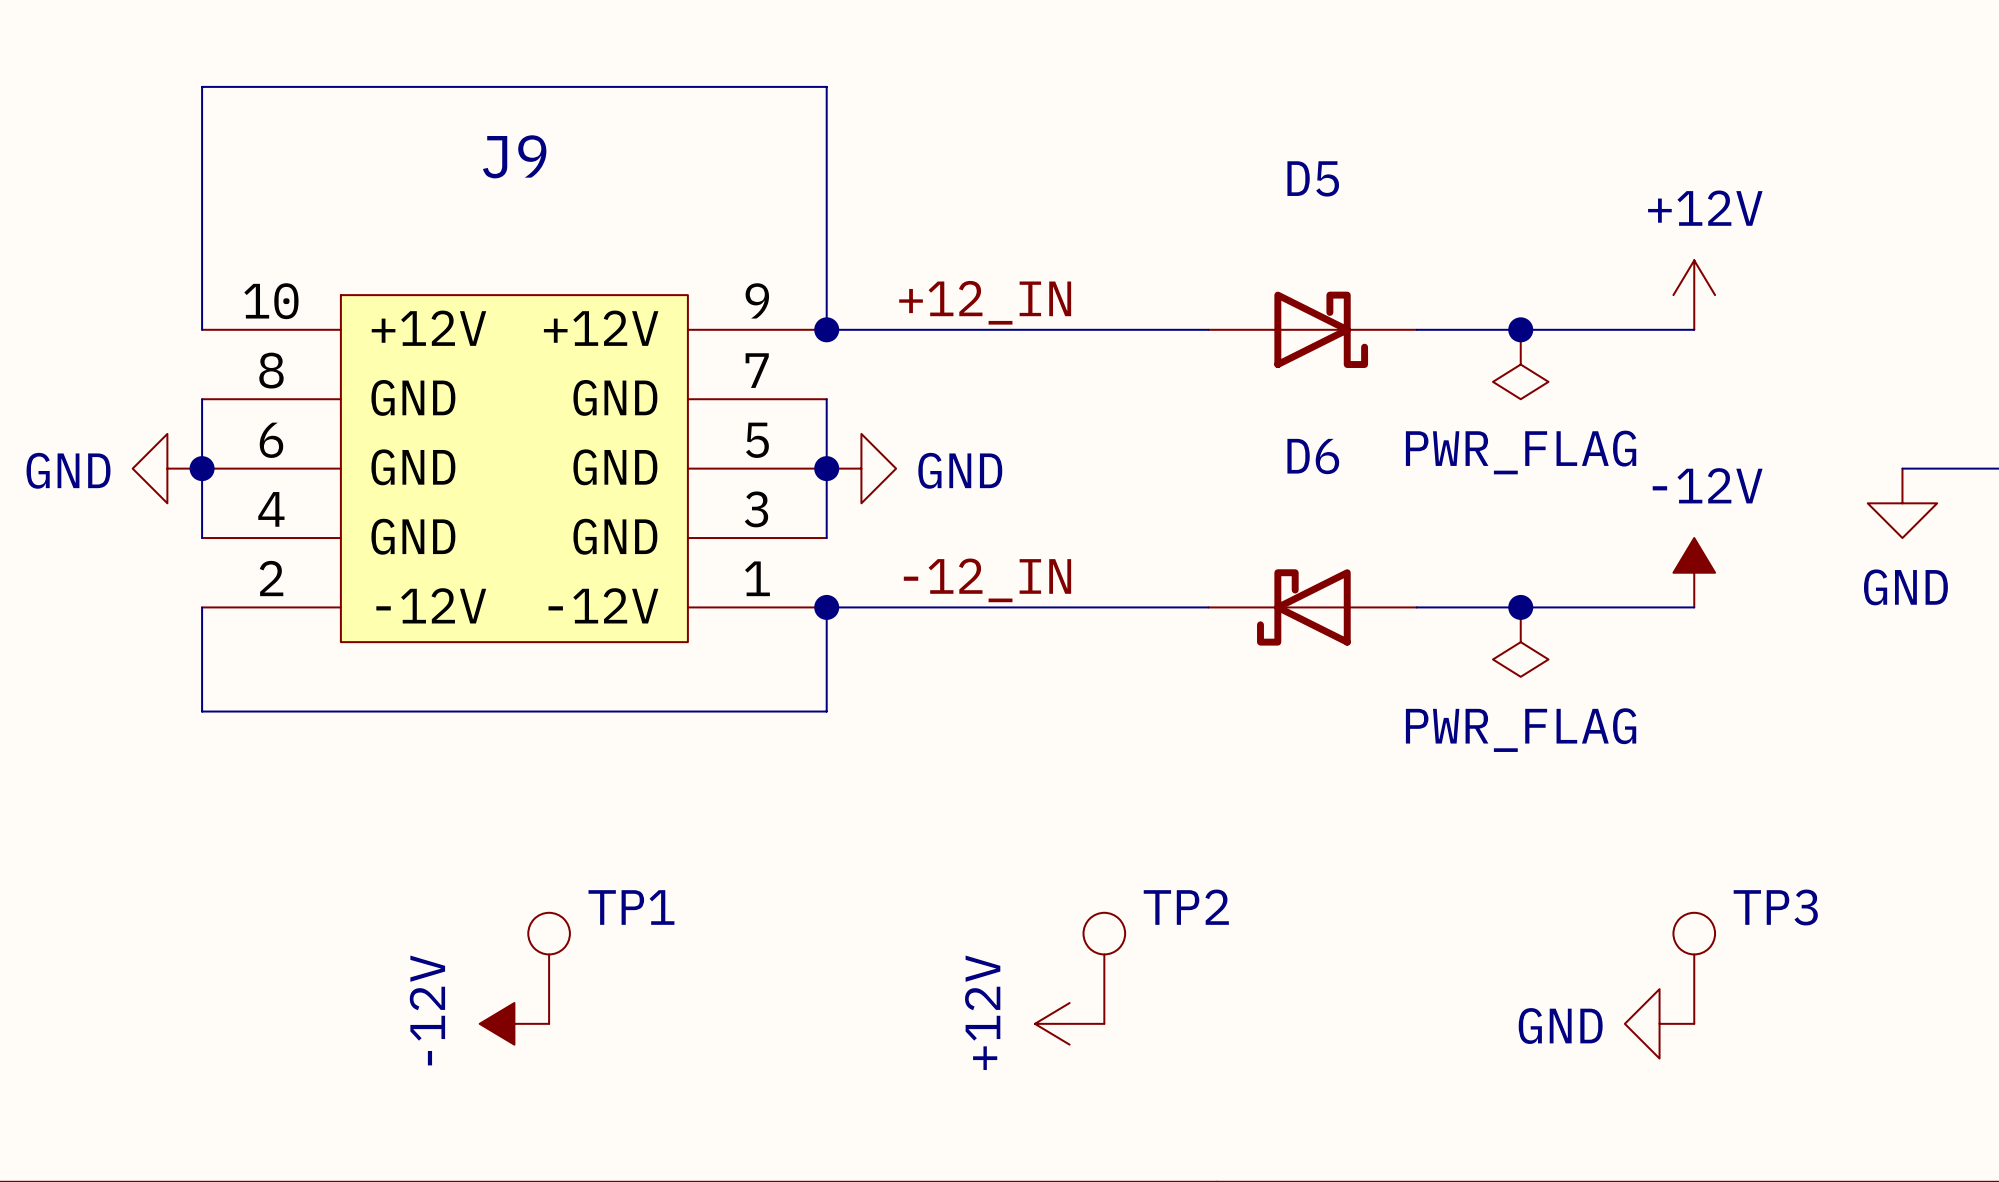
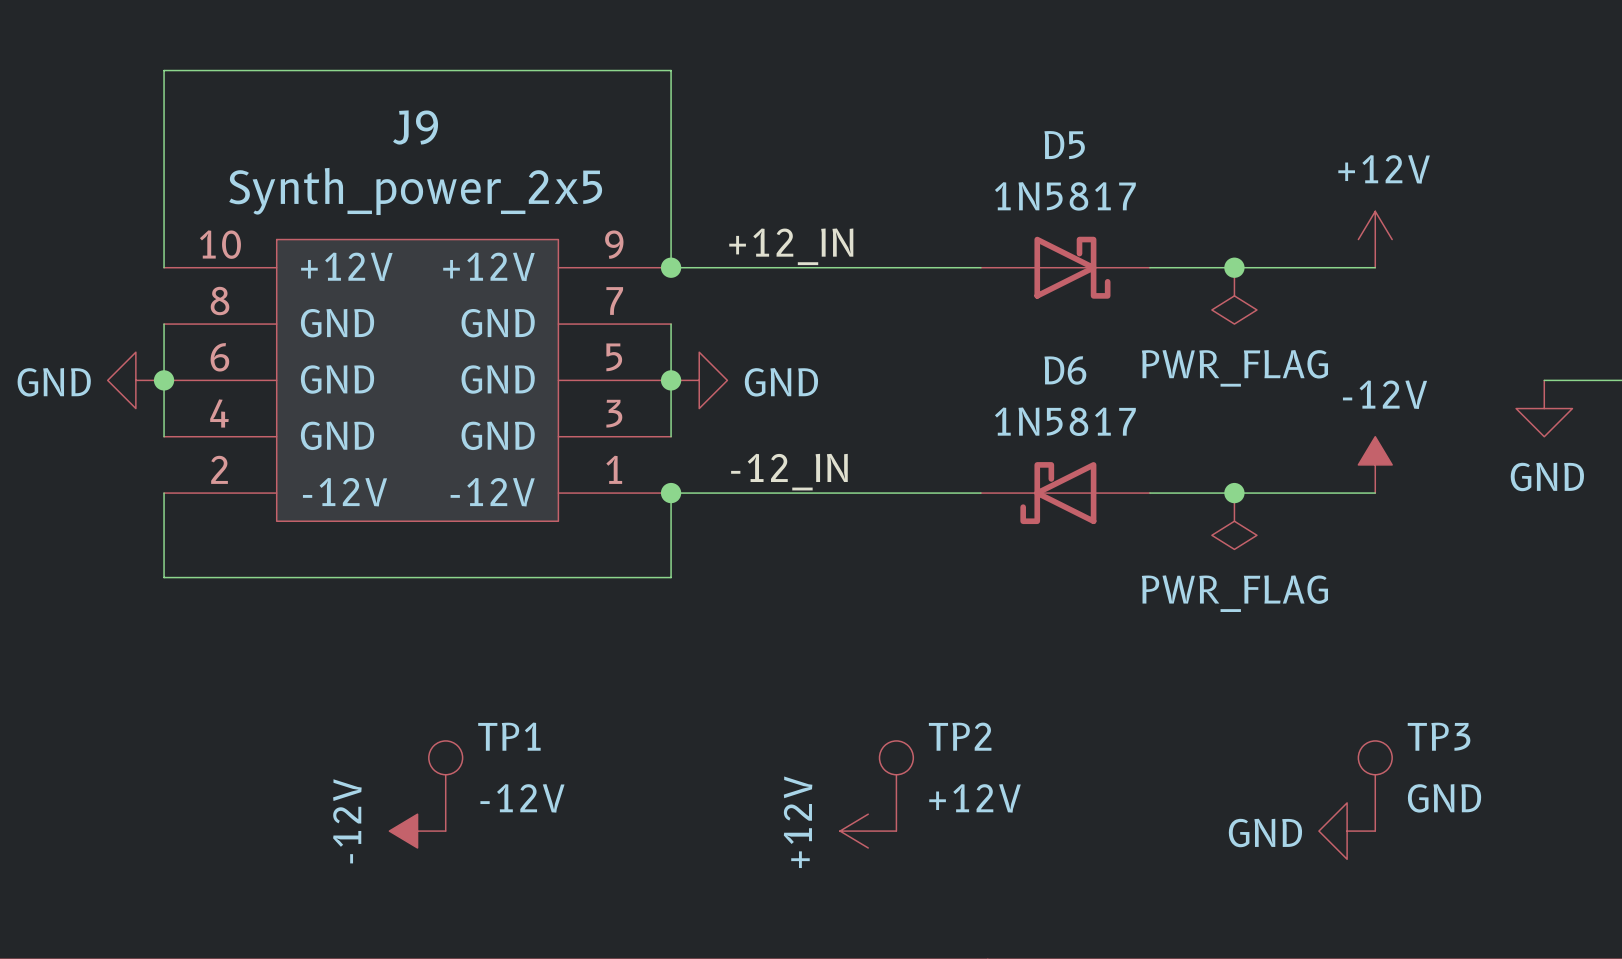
J9 value: none -> Synth_power_2x5 (415, 191)
D5 value: none -> 1N5817 (1065, 196)
D6 value: none -> 1N5817 (1065, 421)
TP1 value: none -> -12V (522, 798)
TP2 value: none -> +12V (975, 798)
TP3 value: none -> GND (1444, 798)

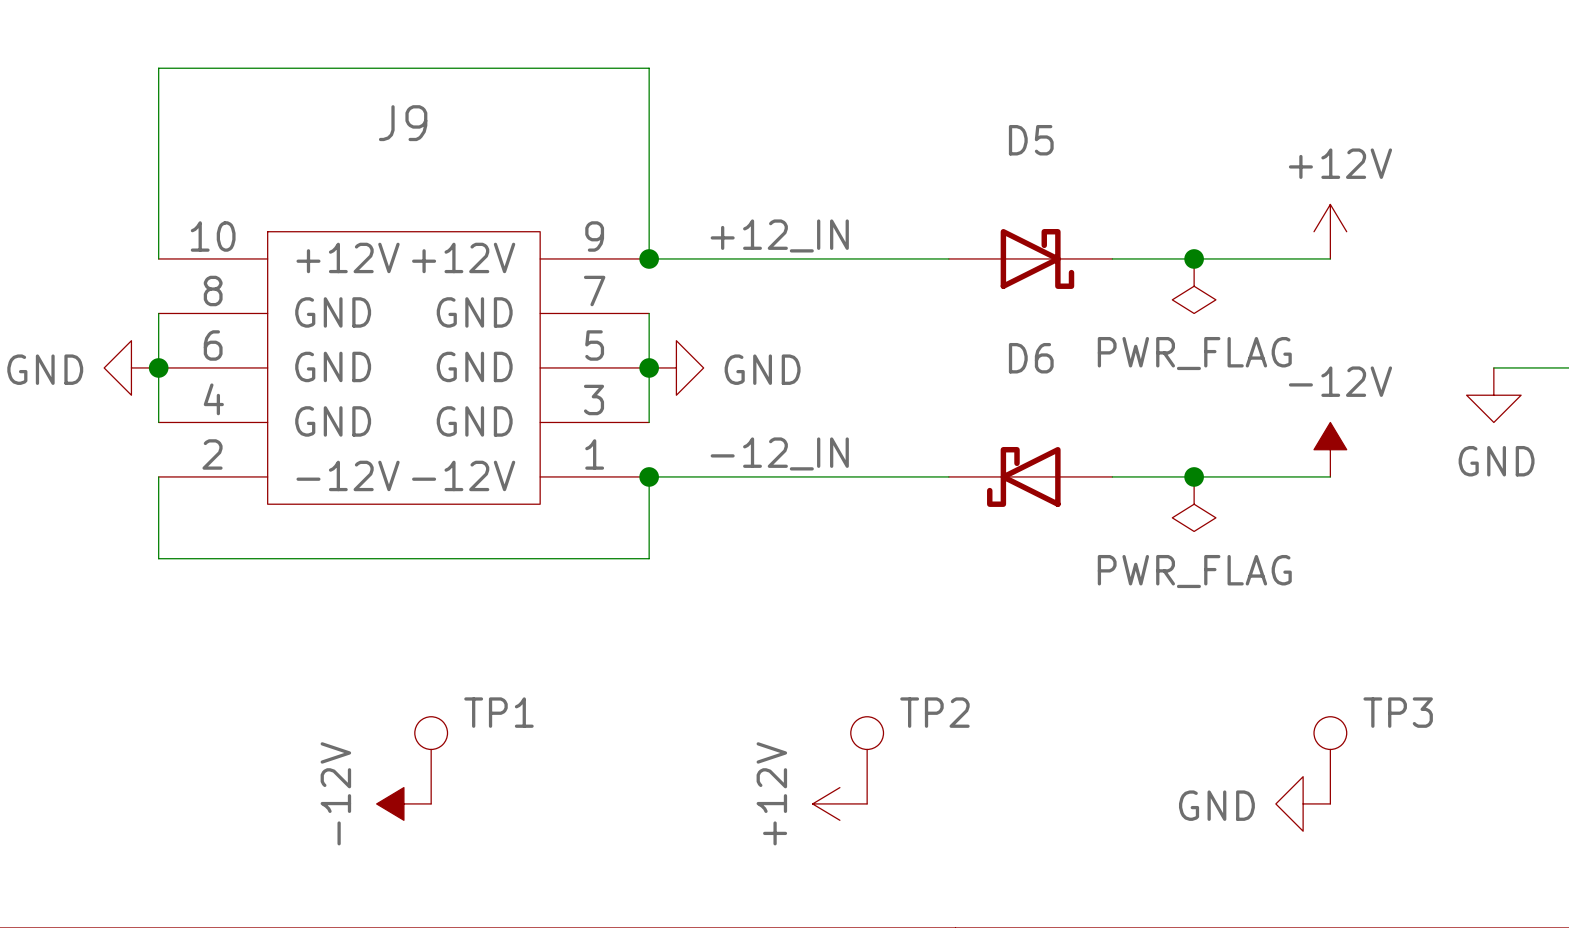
J9 value: Synth_power_2x5 (415, 191) -> none
D5 value: 1N5817 (1065, 196) -> none
D6 value: 1N5817 (1065, 421) -> none
TP1 value: -12V (522, 798) -> none
TP2 value: +12V (975, 798) -> none
TP3 value: GND (1444, 798) -> none

